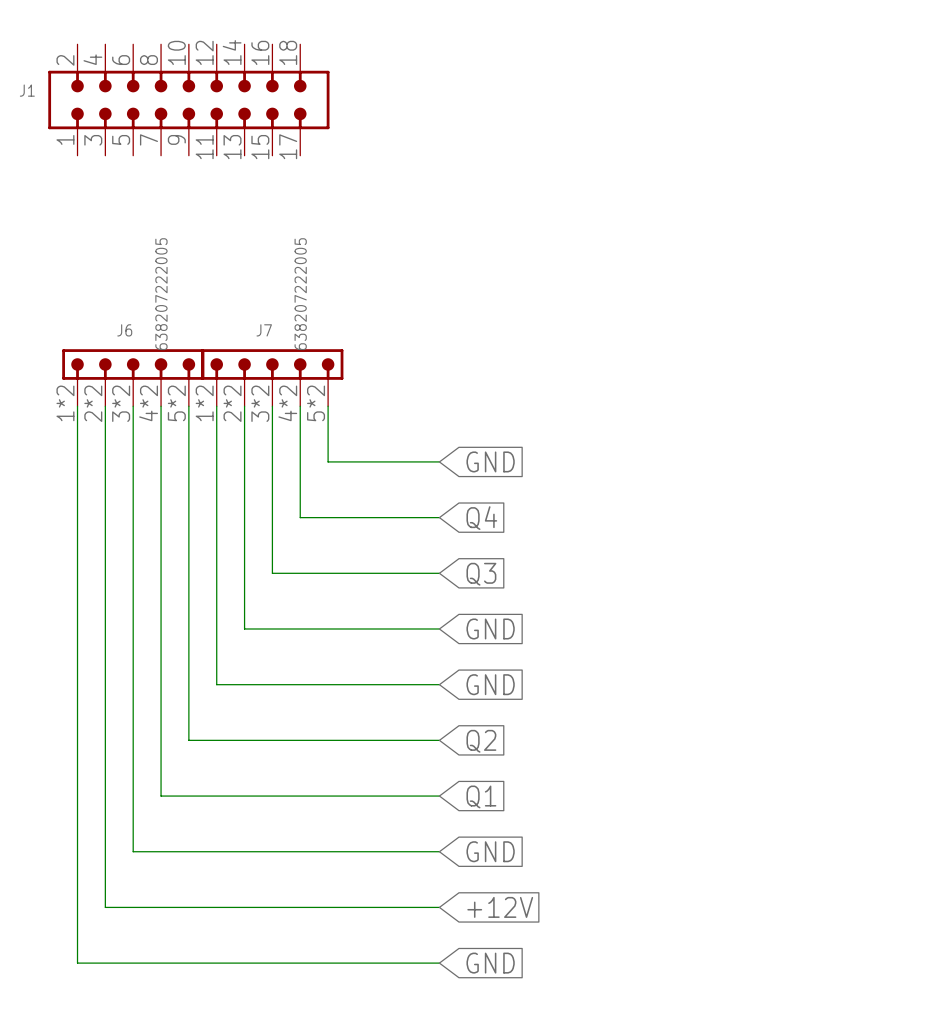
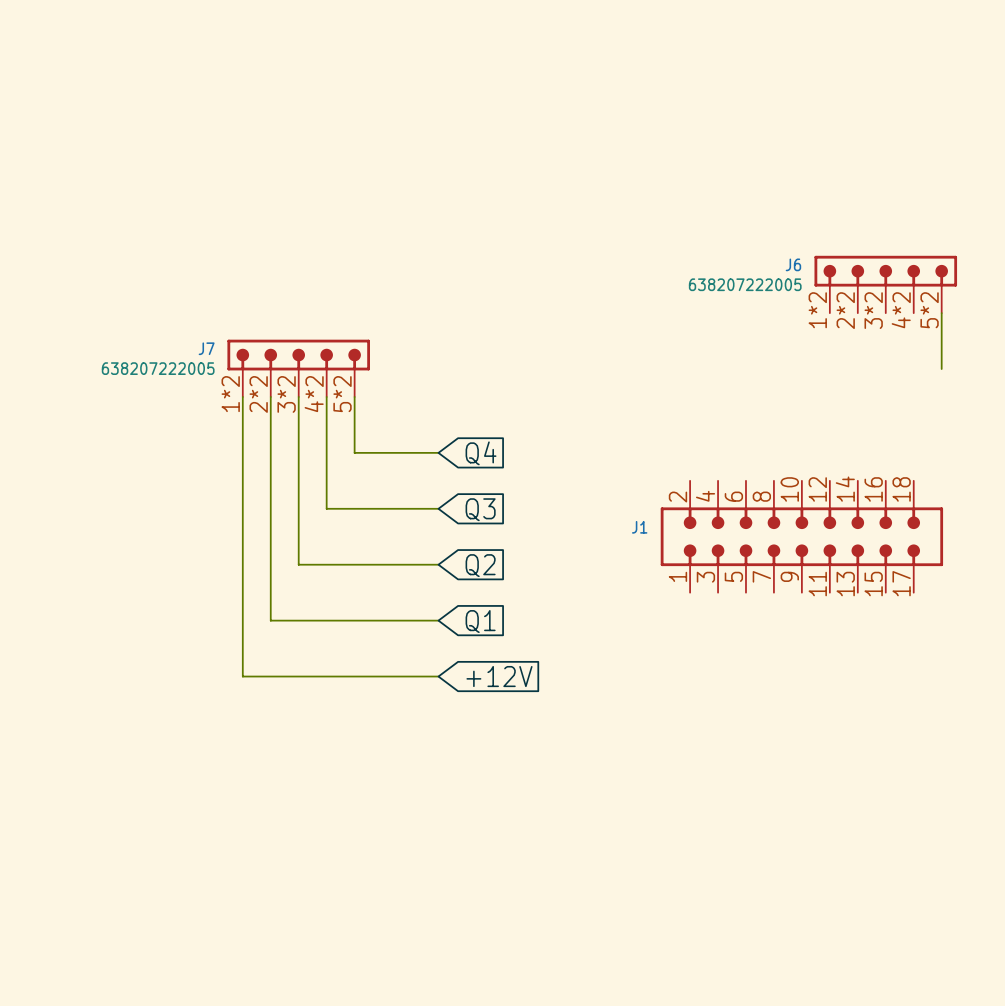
J1 position: (188, 100) -> (801, 536)
J6 value rotation: 0° (161, 294) -> 90° clockwise (745, 284)
J6 value position: 638207222005 (161, 294) -> 638207222005 (745, 284)
J7 value rotation: 0° (300, 294) -> 90° clockwise (158, 368)
J7 value position: 638207222005 (300, 294) -> 638207222005 (158, 368)
wire: none -> (941, 313) (941, 369)
J6 name position: J6 (124, 330) -> J6 (793, 264)
J7 name position: J7 (264, 330) -> J7 (206, 348)
J6 position: (133, 377) -> (885, 284)
wire: (77, 406) (77, 963) (439, 963) -> none
wire: (105, 406) (105, 907) (439, 907) -> none
wire: (133, 406) (133, 851) (439, 851) -> none
wire: (161, 406) (161, 796) (439, 796) -> none
wire: (188, 406) (188, 740) (439, 740) -> none
wire: (411, 461) (439, 461) -> none
global label: GND (490, 461) -> none
wire: (411, 517) (439, 517) -> none
global label position: Q4 (481, 518) -> Q4 (481, 453)
wire: (411, 573) (439, 573) -> none
global label position: Q3 (481, 574) -> Q3 (480, 509)
wire: (411, 628) (439, 628) -> none
global label: GND (490, 628) -> none
wire: (411, 684) (439, 684) -> none
global label: GND (490, 684) -> none
global label position: Q2 (481, 741) -> Q2 (480, 565)
global label position: Q1 (481, 796) -> Q1 (480, 621)
global label: GND (490, 851) -> none
global label position: +12V (500, 907) -> +12V (499, 676)
global label: GND (490, 963) -> none

